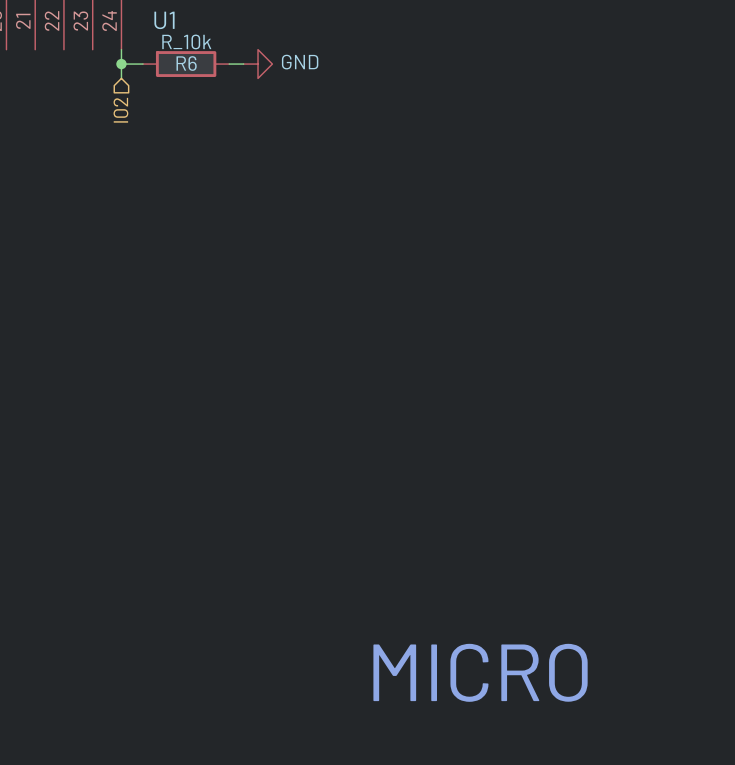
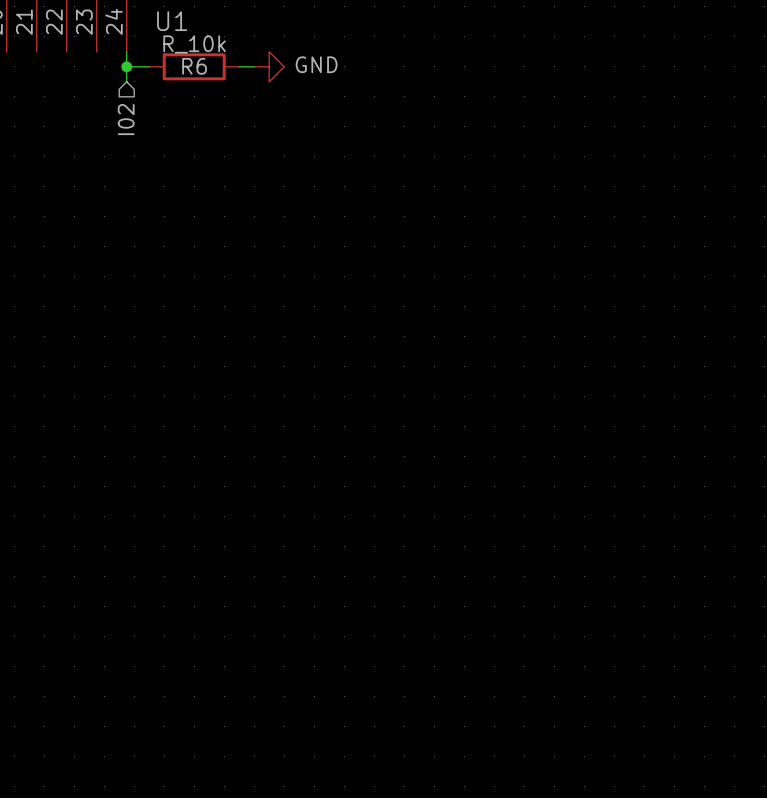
text: MICRO (480, 672) -> none

